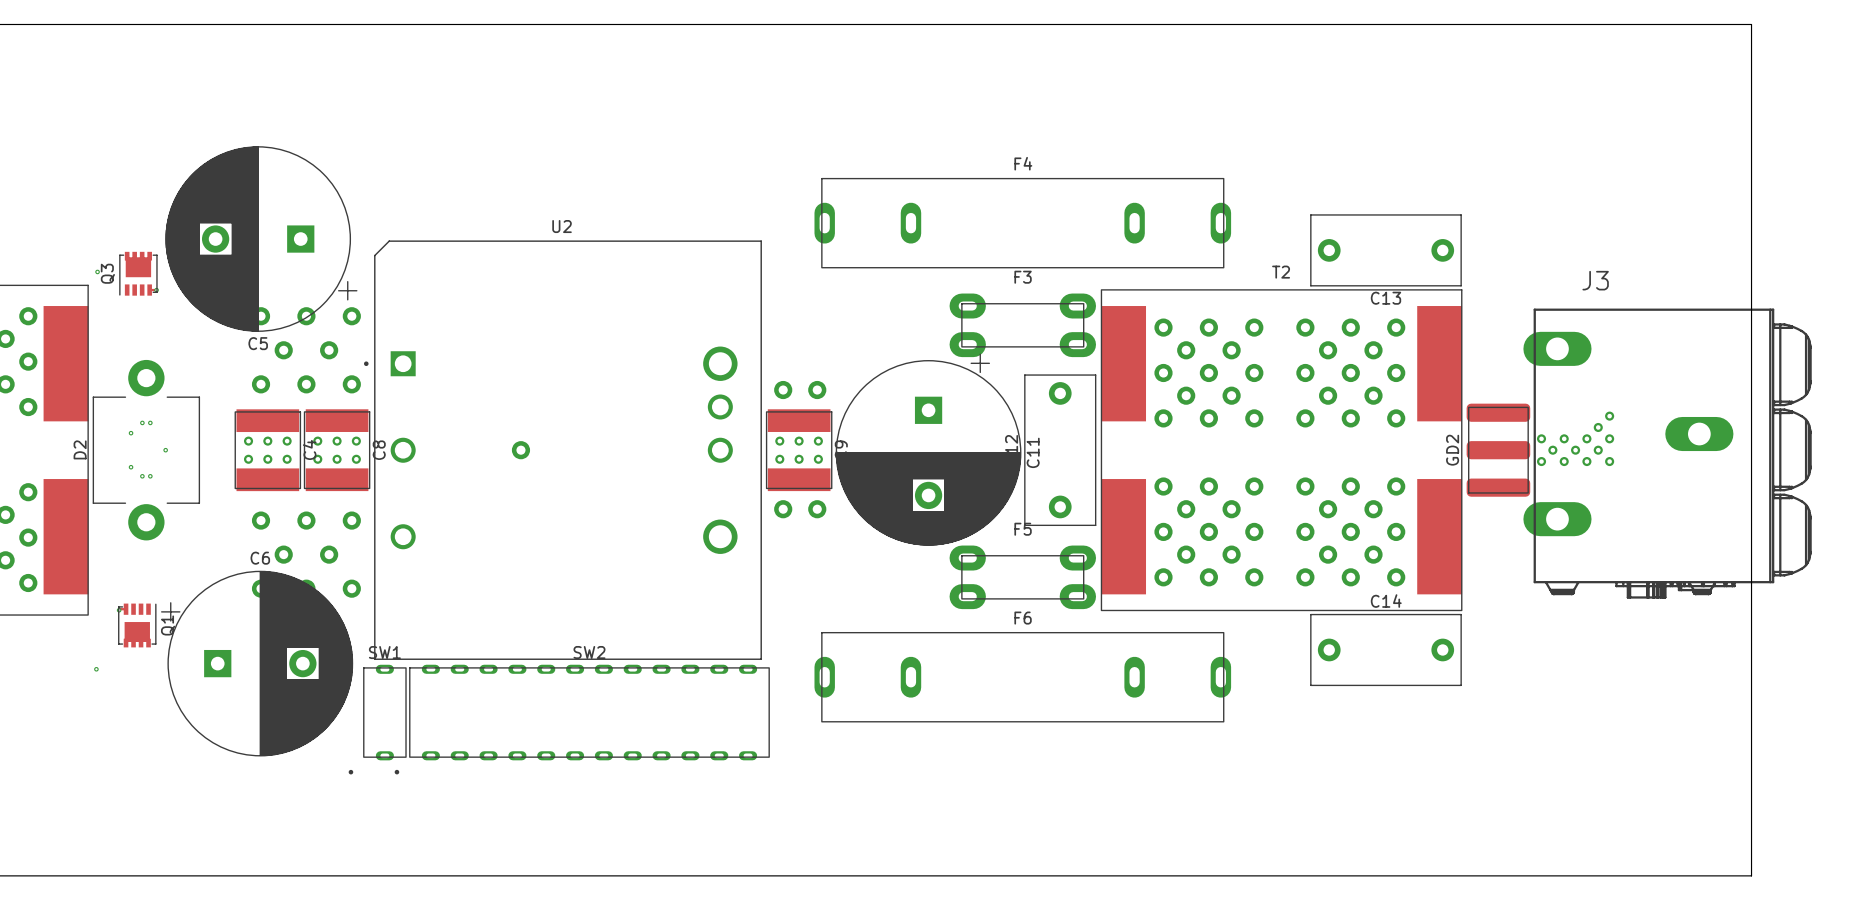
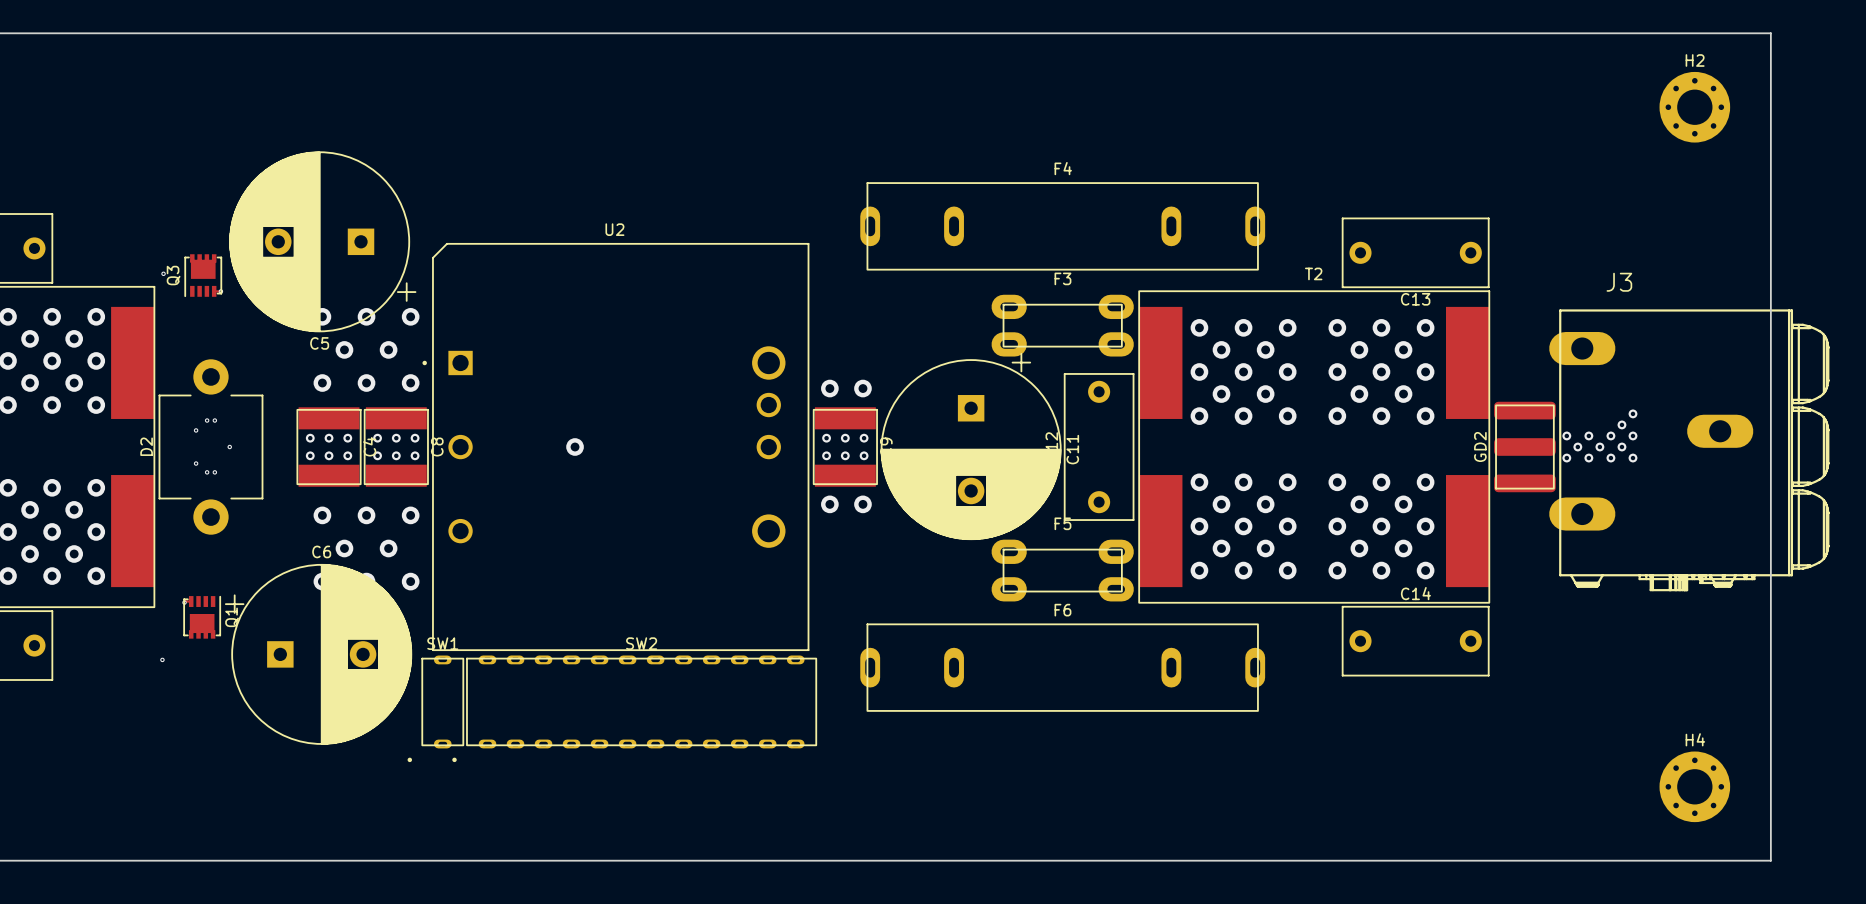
H2: none -> (1694, 107)
H4: none -> (1694, 786)

